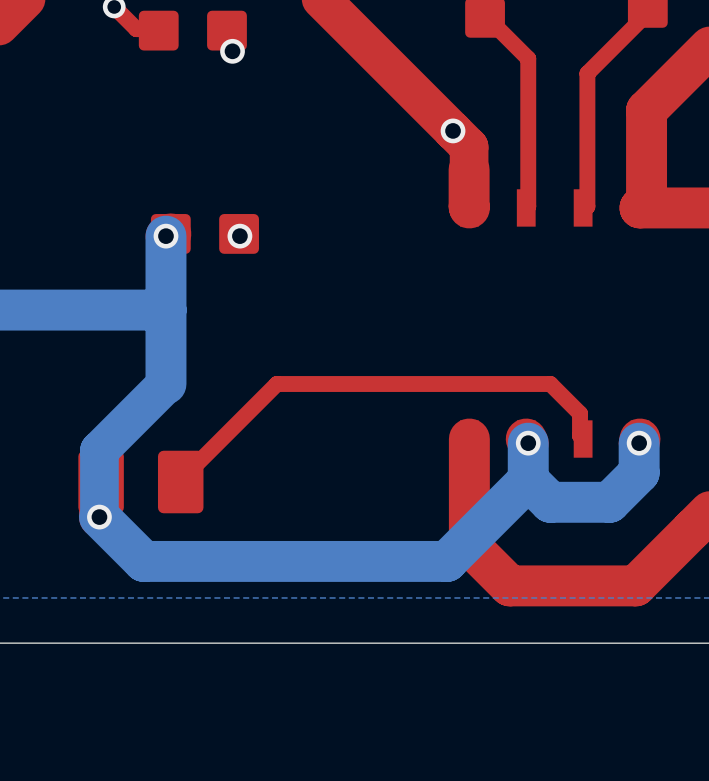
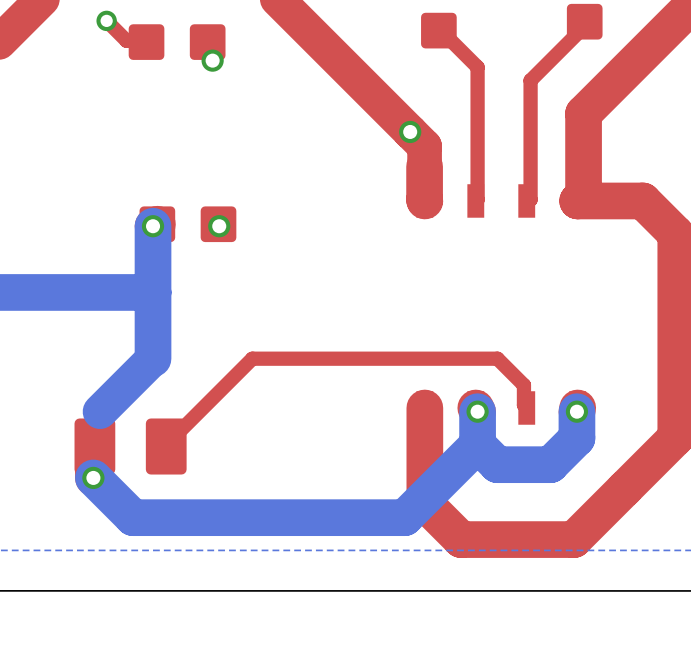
bottom track: (106, 443) (99, 450) (99, 517) -> none

